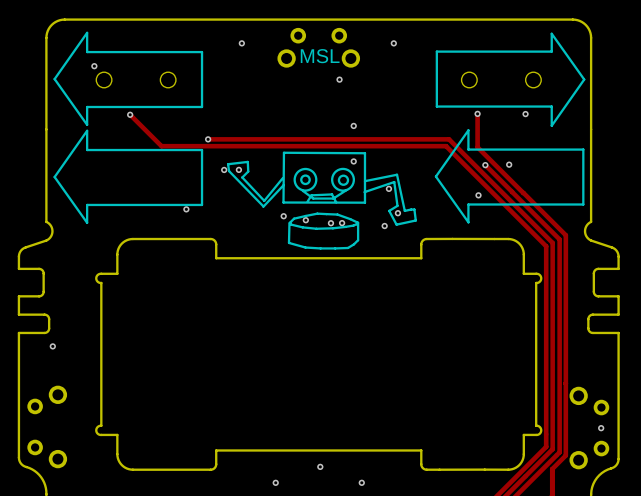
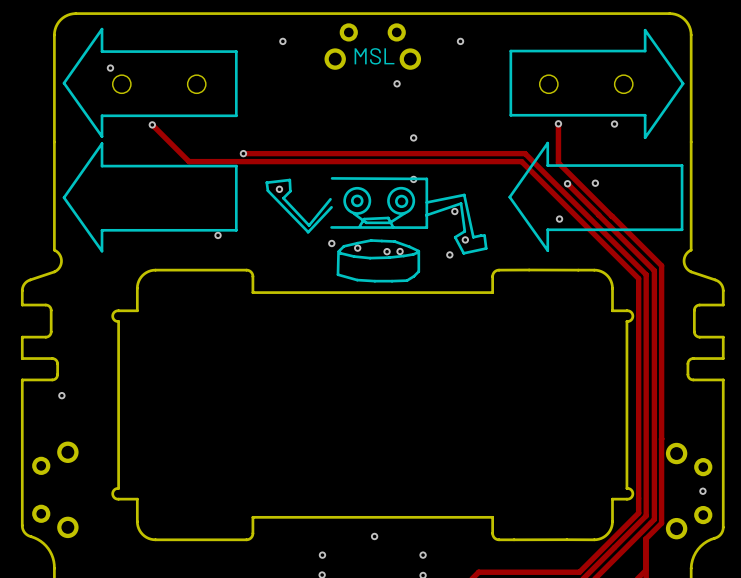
line: (364, 161) (364, 153) (283, 152) (283, 202) -> (426, 178) (332, 178)
via: (224, 169) -> none

